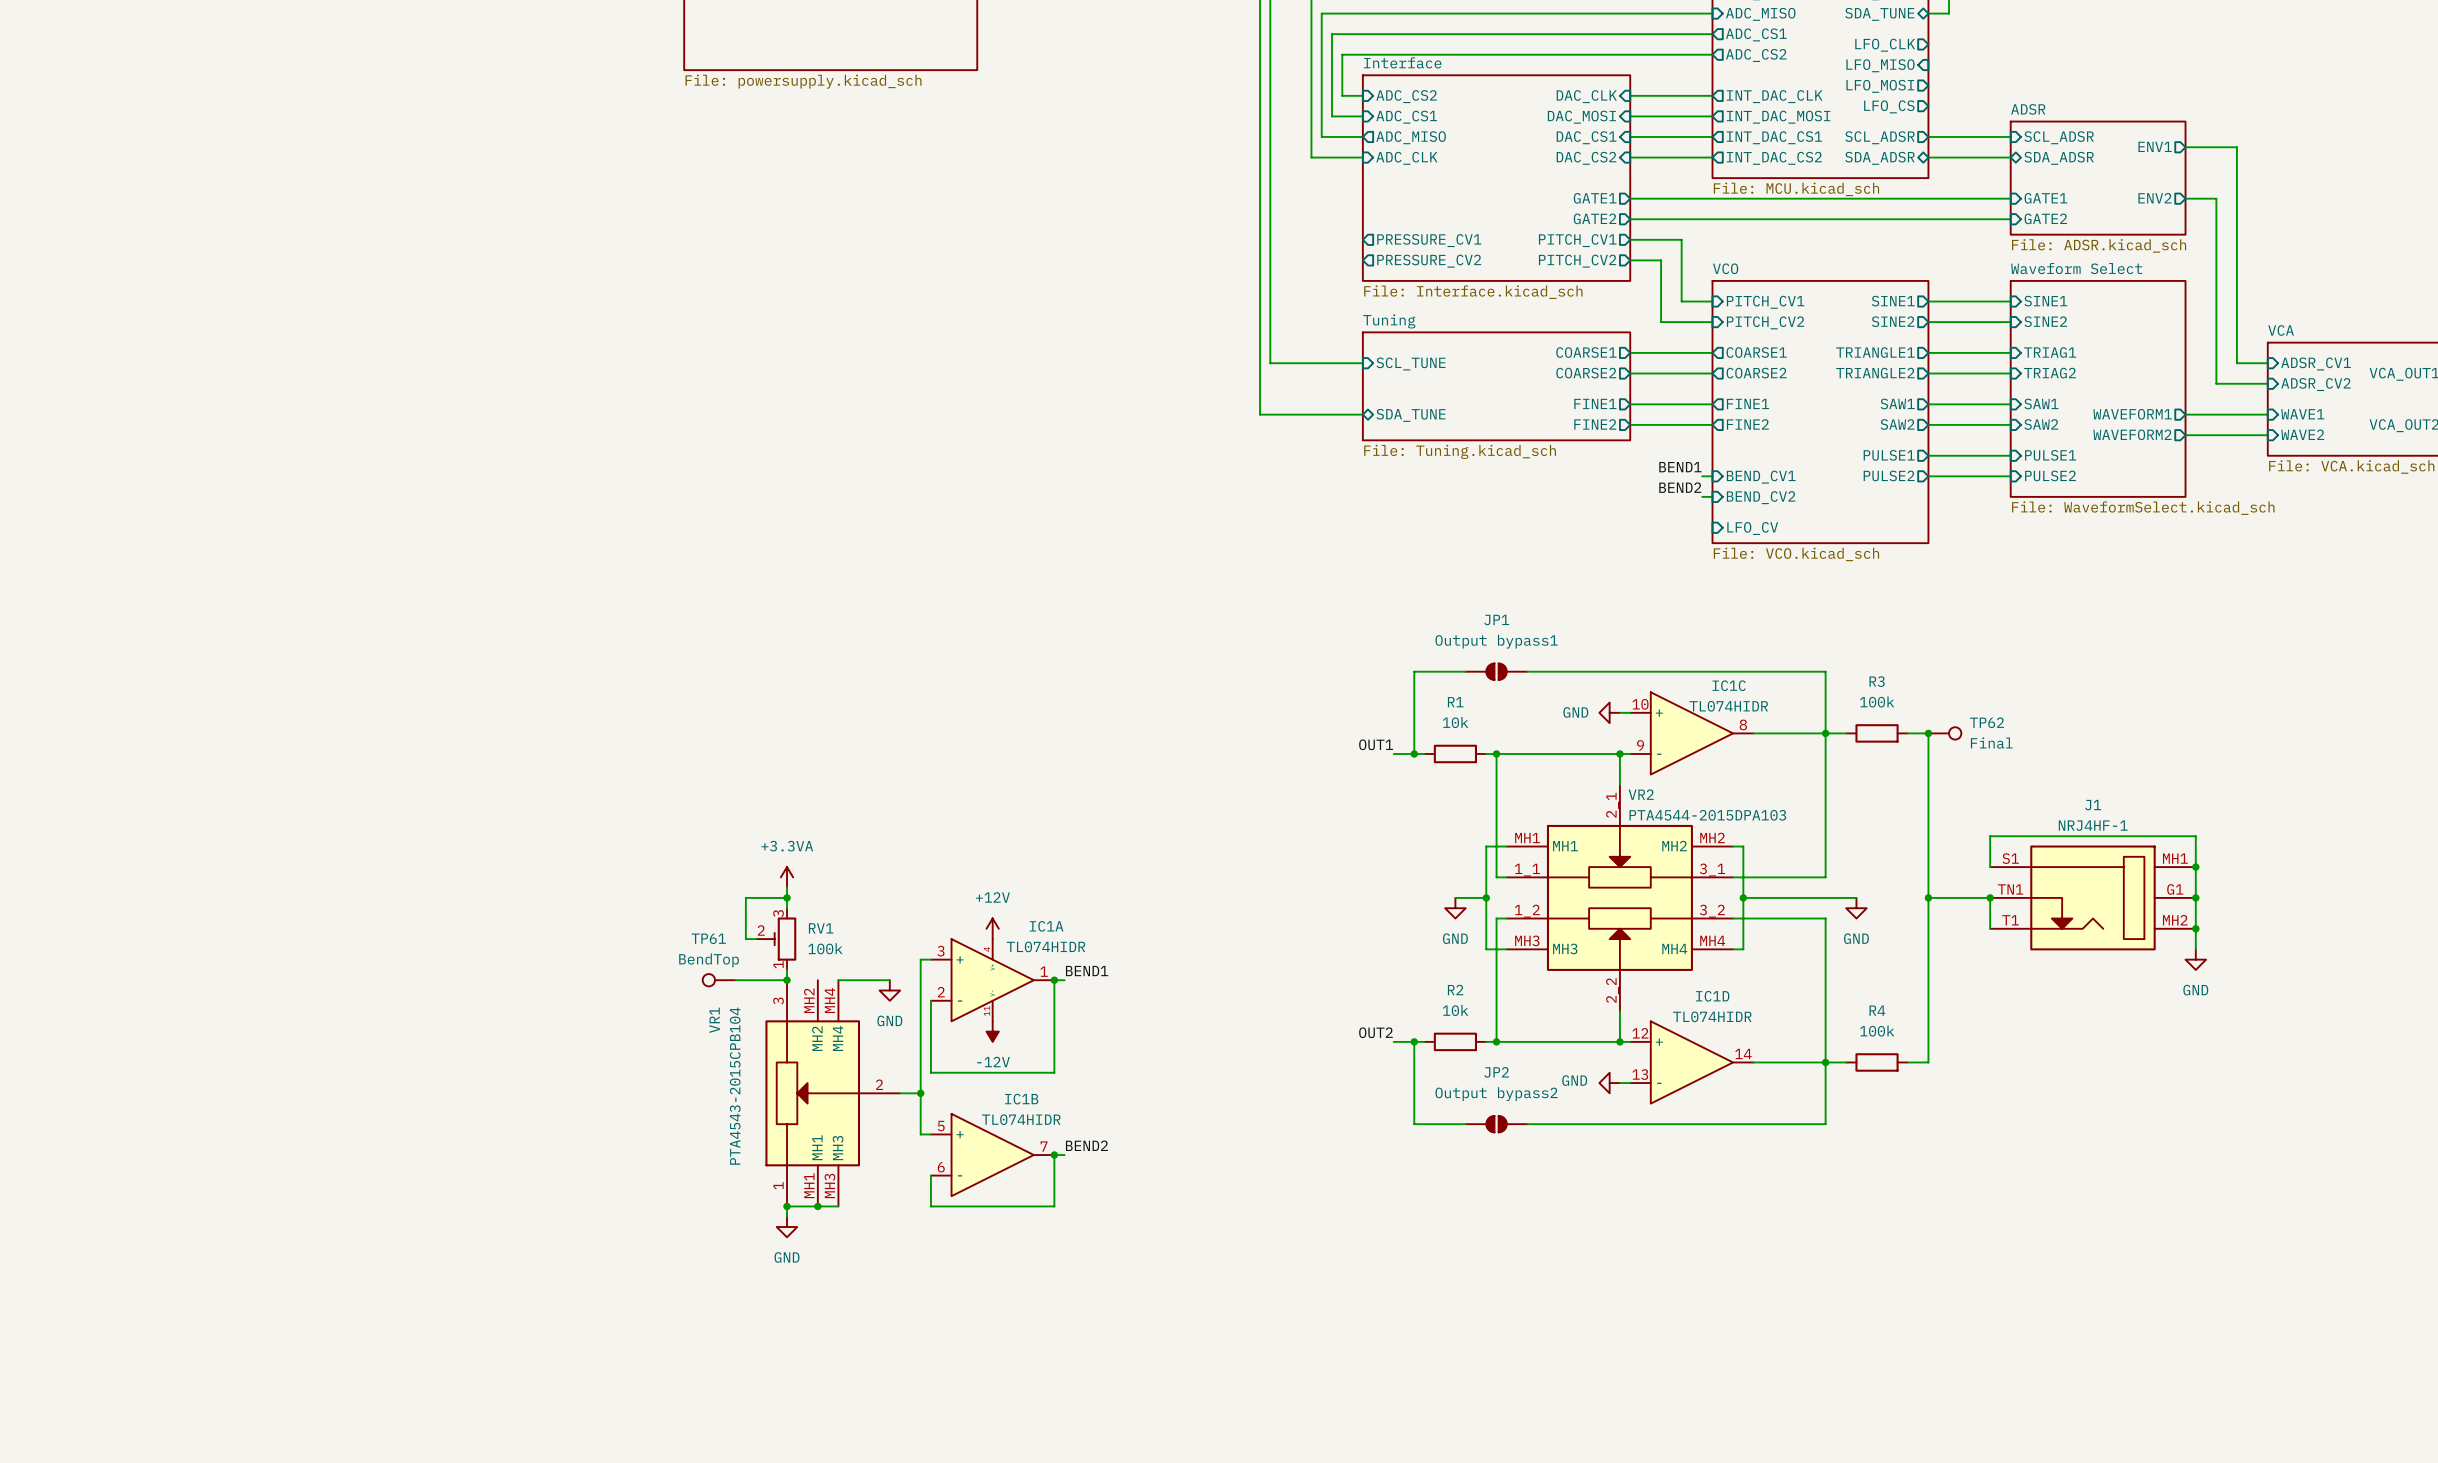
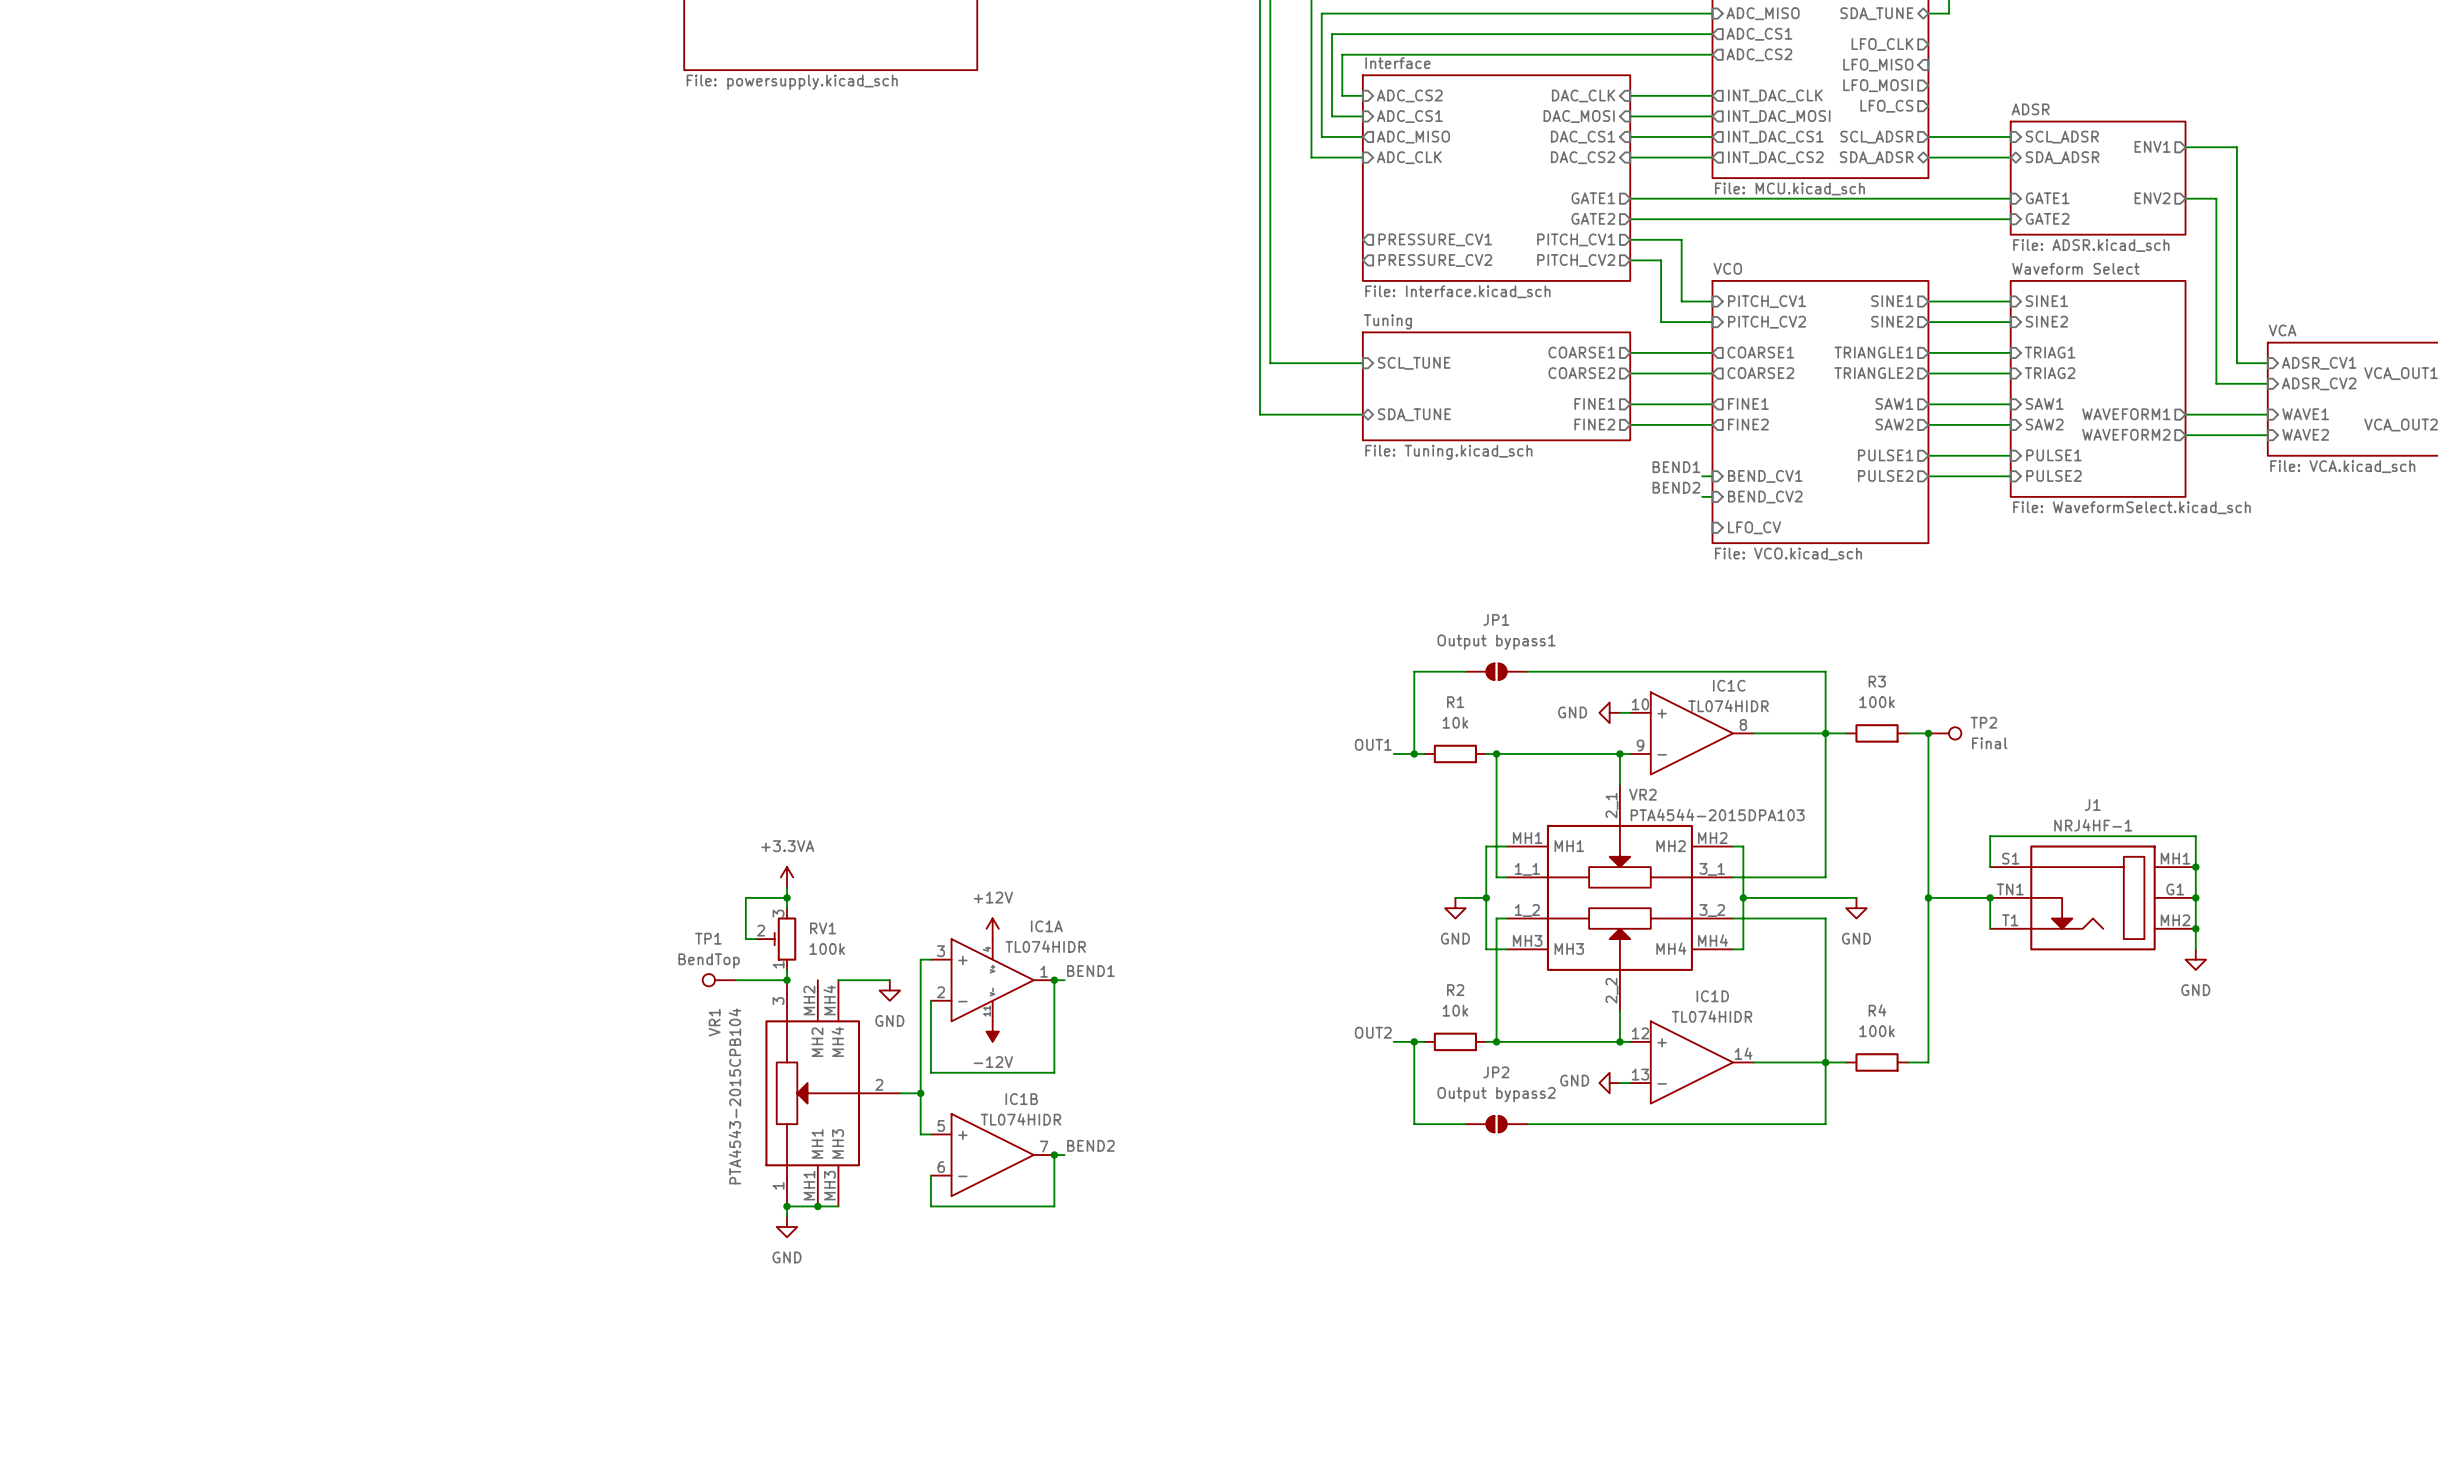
TP62 name: TP62 (1986, 722) -> TP2 (1983, 722)
TP61 name: TP61 (708, 938) -> TP1 (708, 938)

